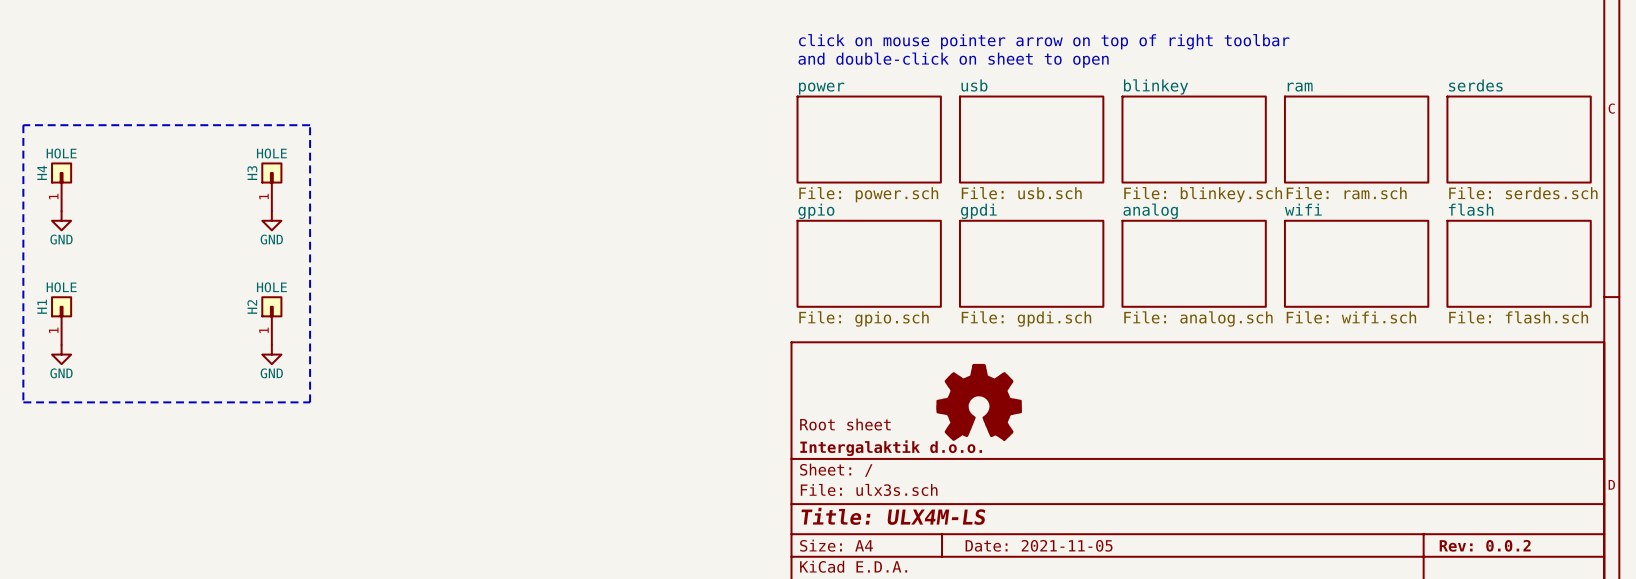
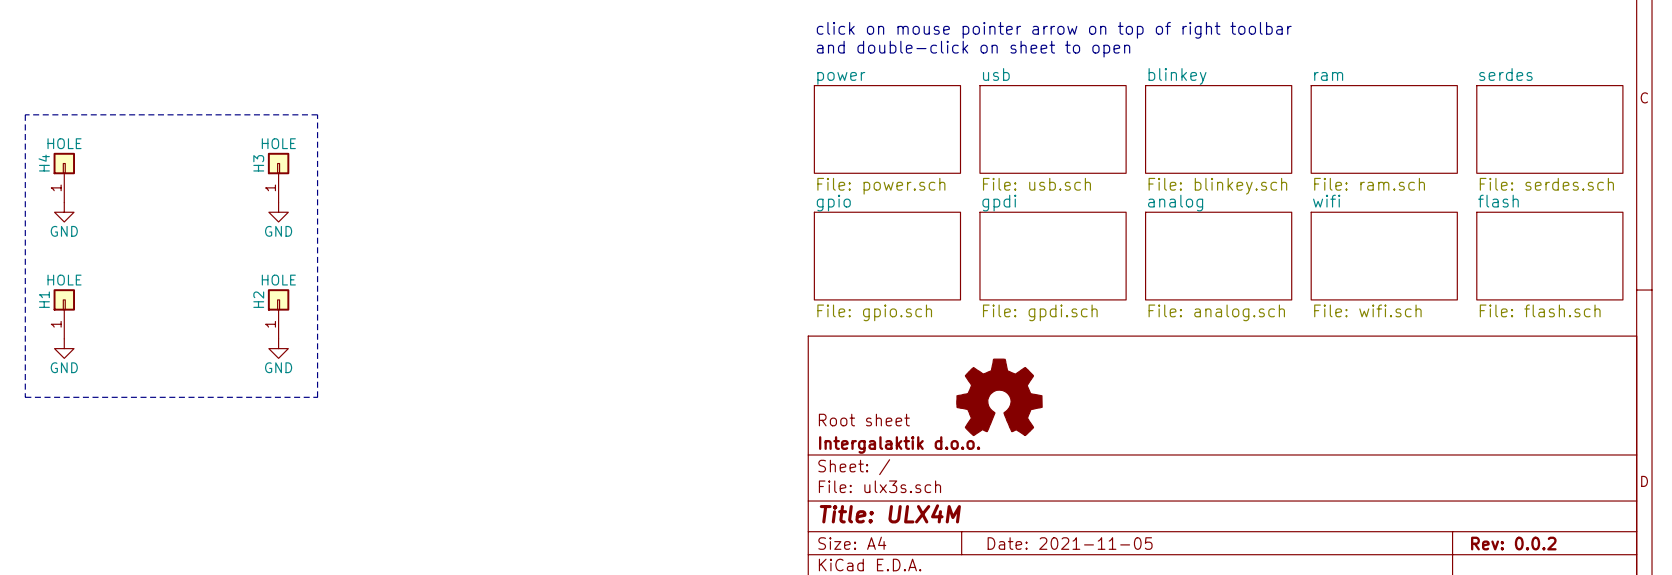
title block: Title: ULX4M-LS (893, 516) -> Title: ULX4M (890, 513)

